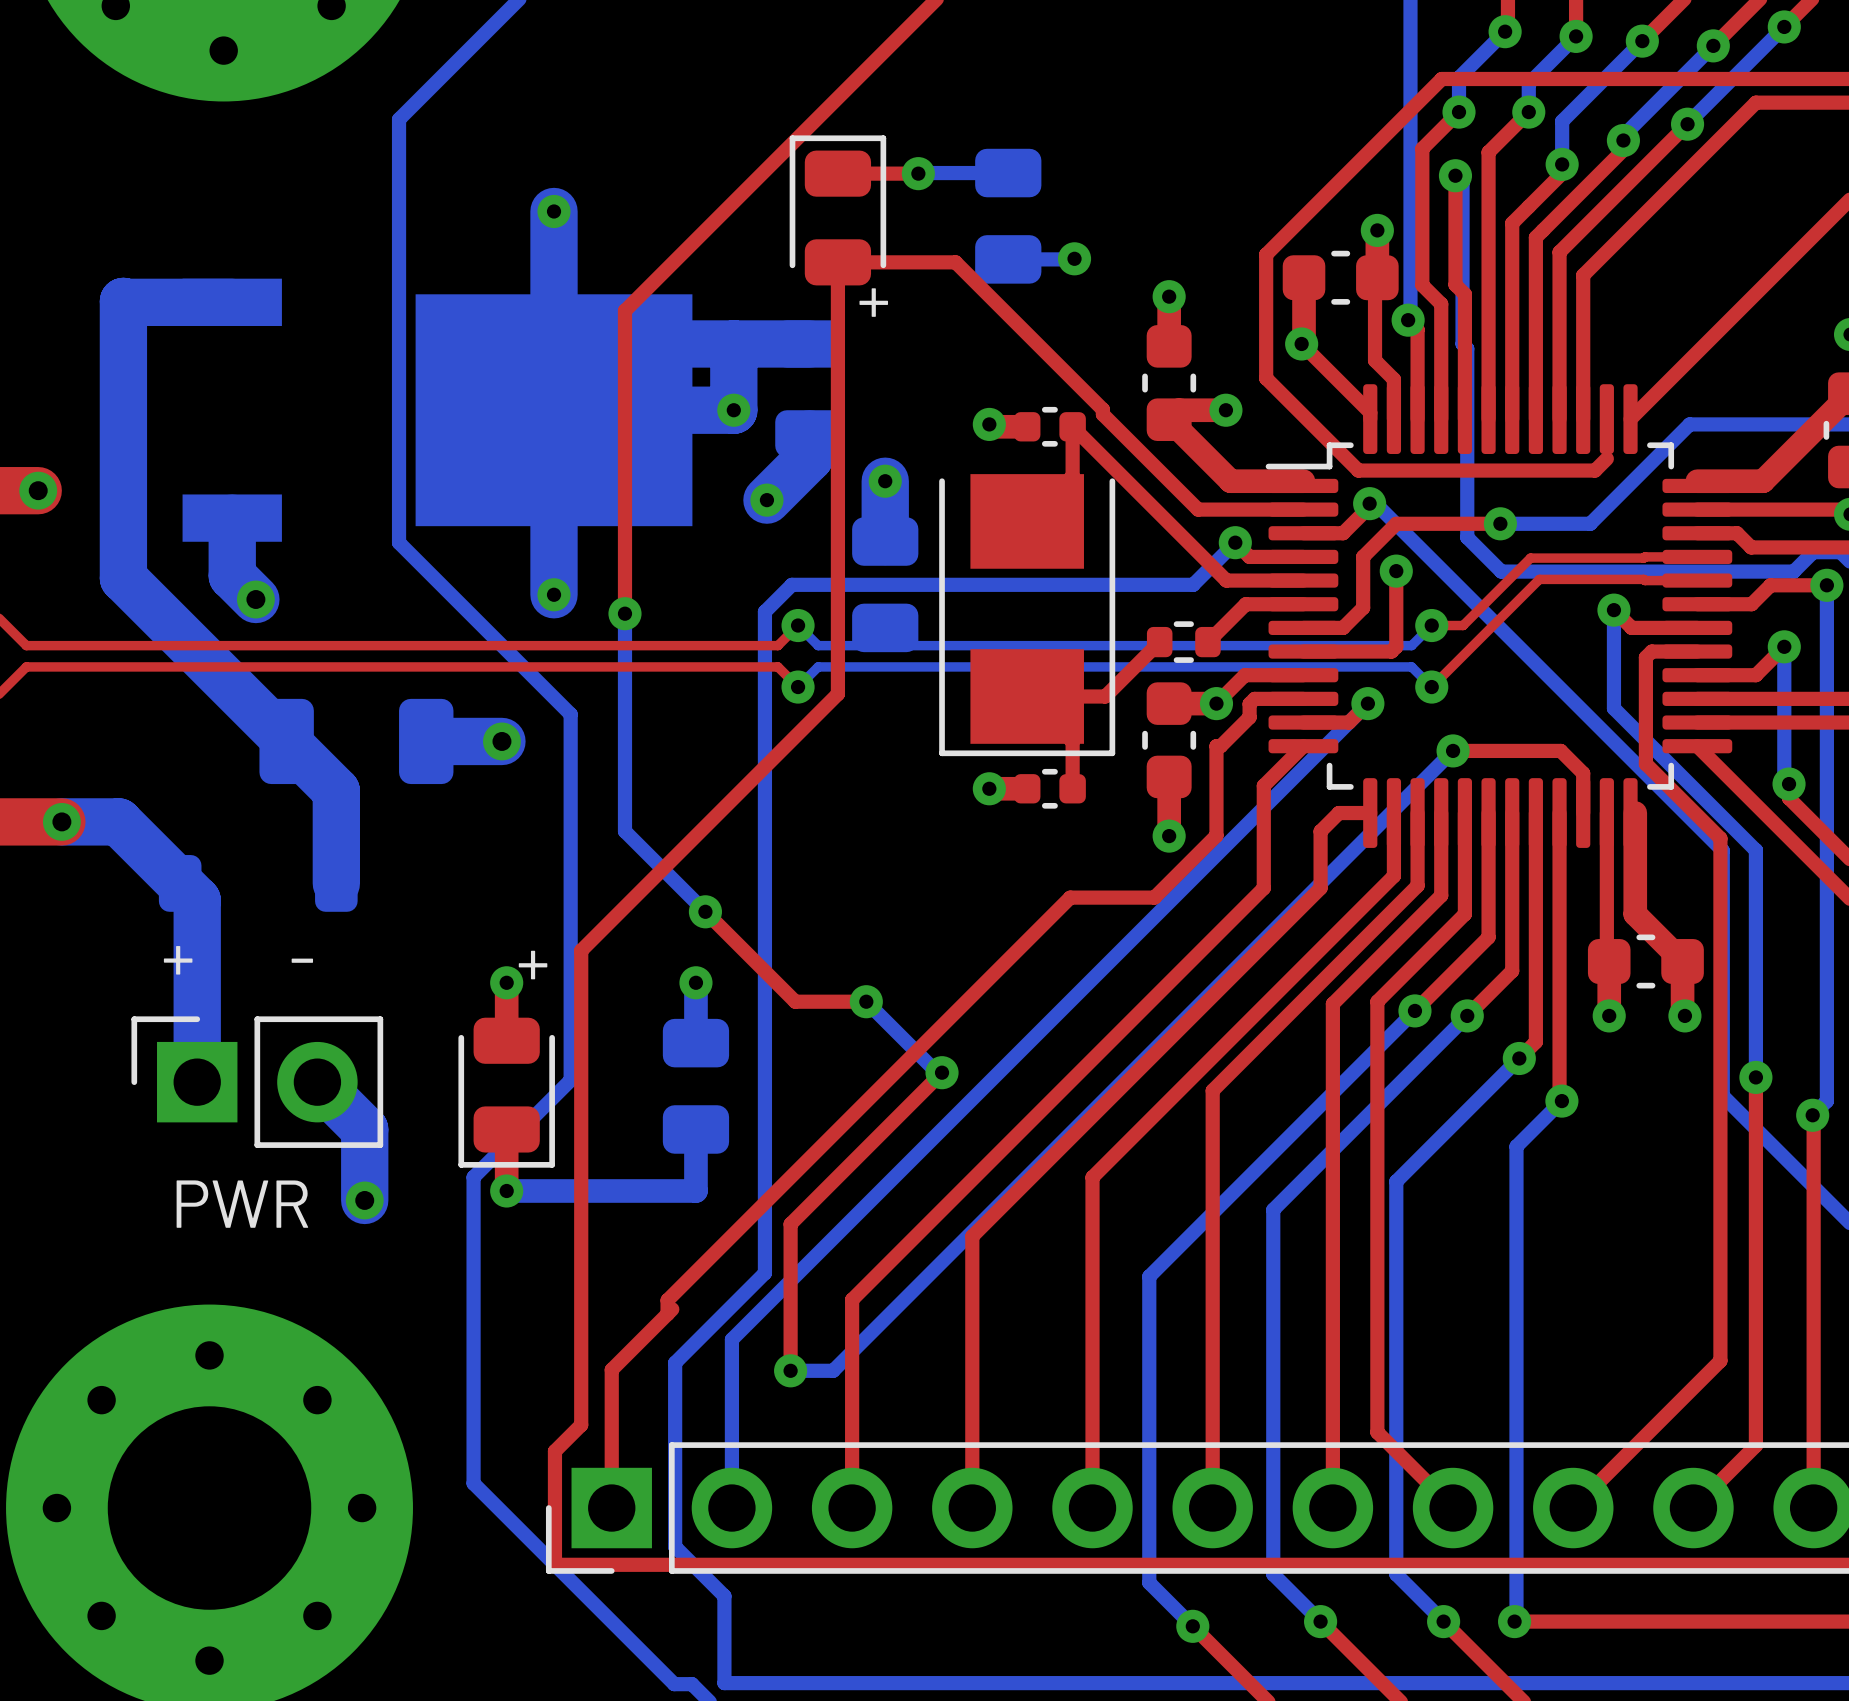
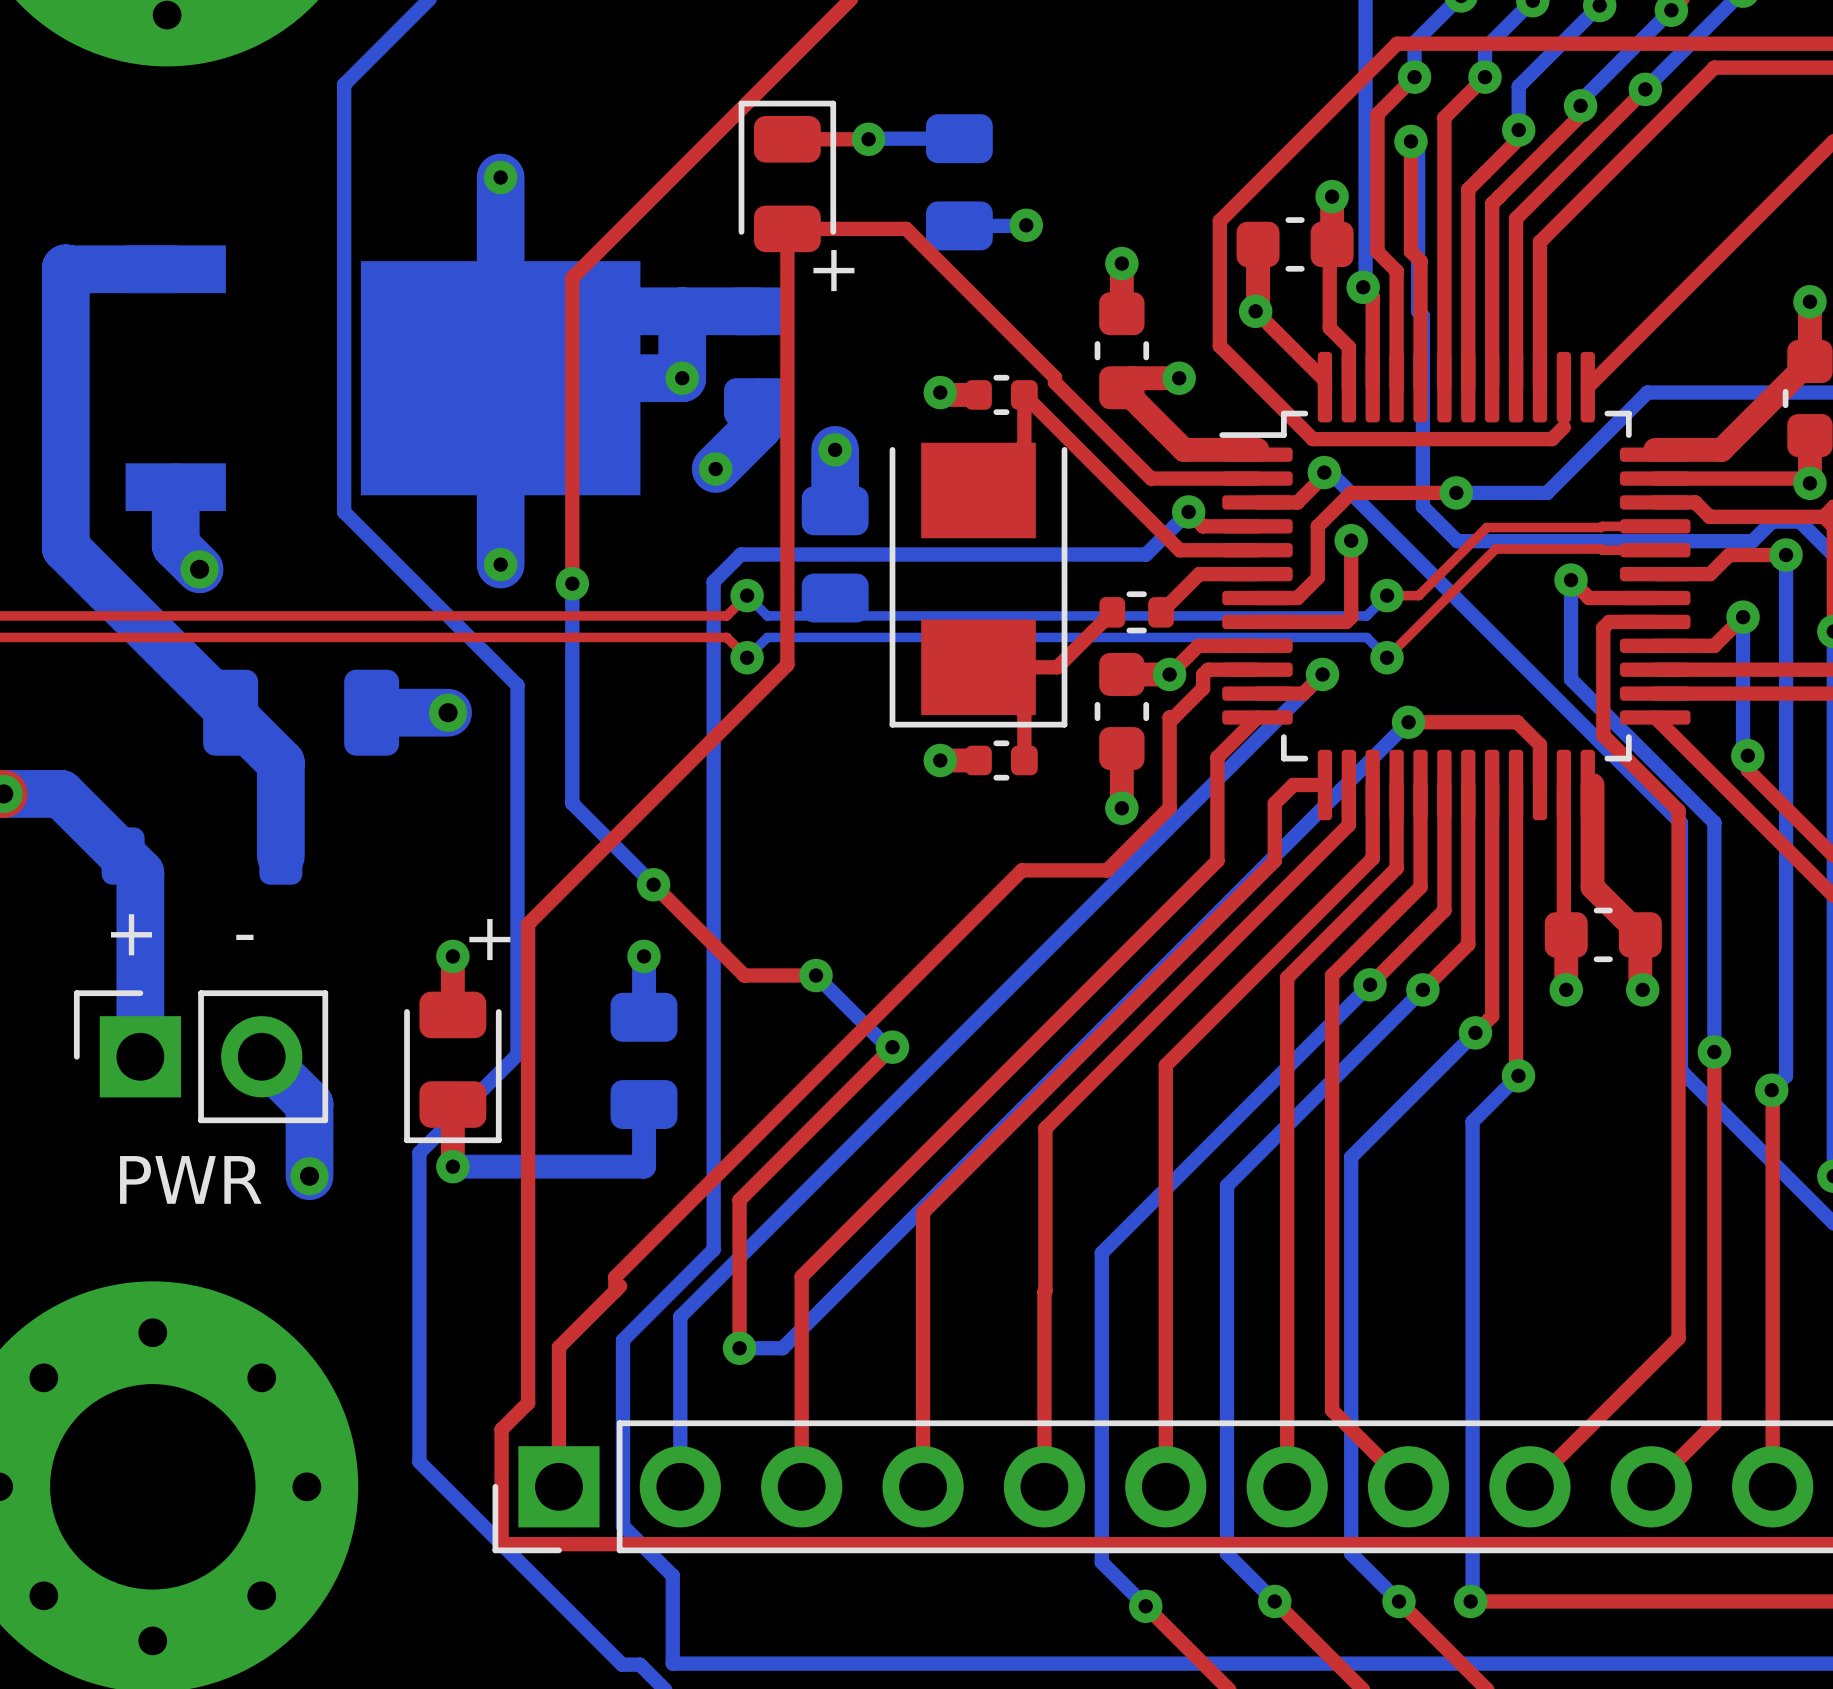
top track: (1393, 852) (1393, 875) (1092, 1177) (1092, 1314) -> (1348, 825) (1045, 1128) (1044, 1291)

